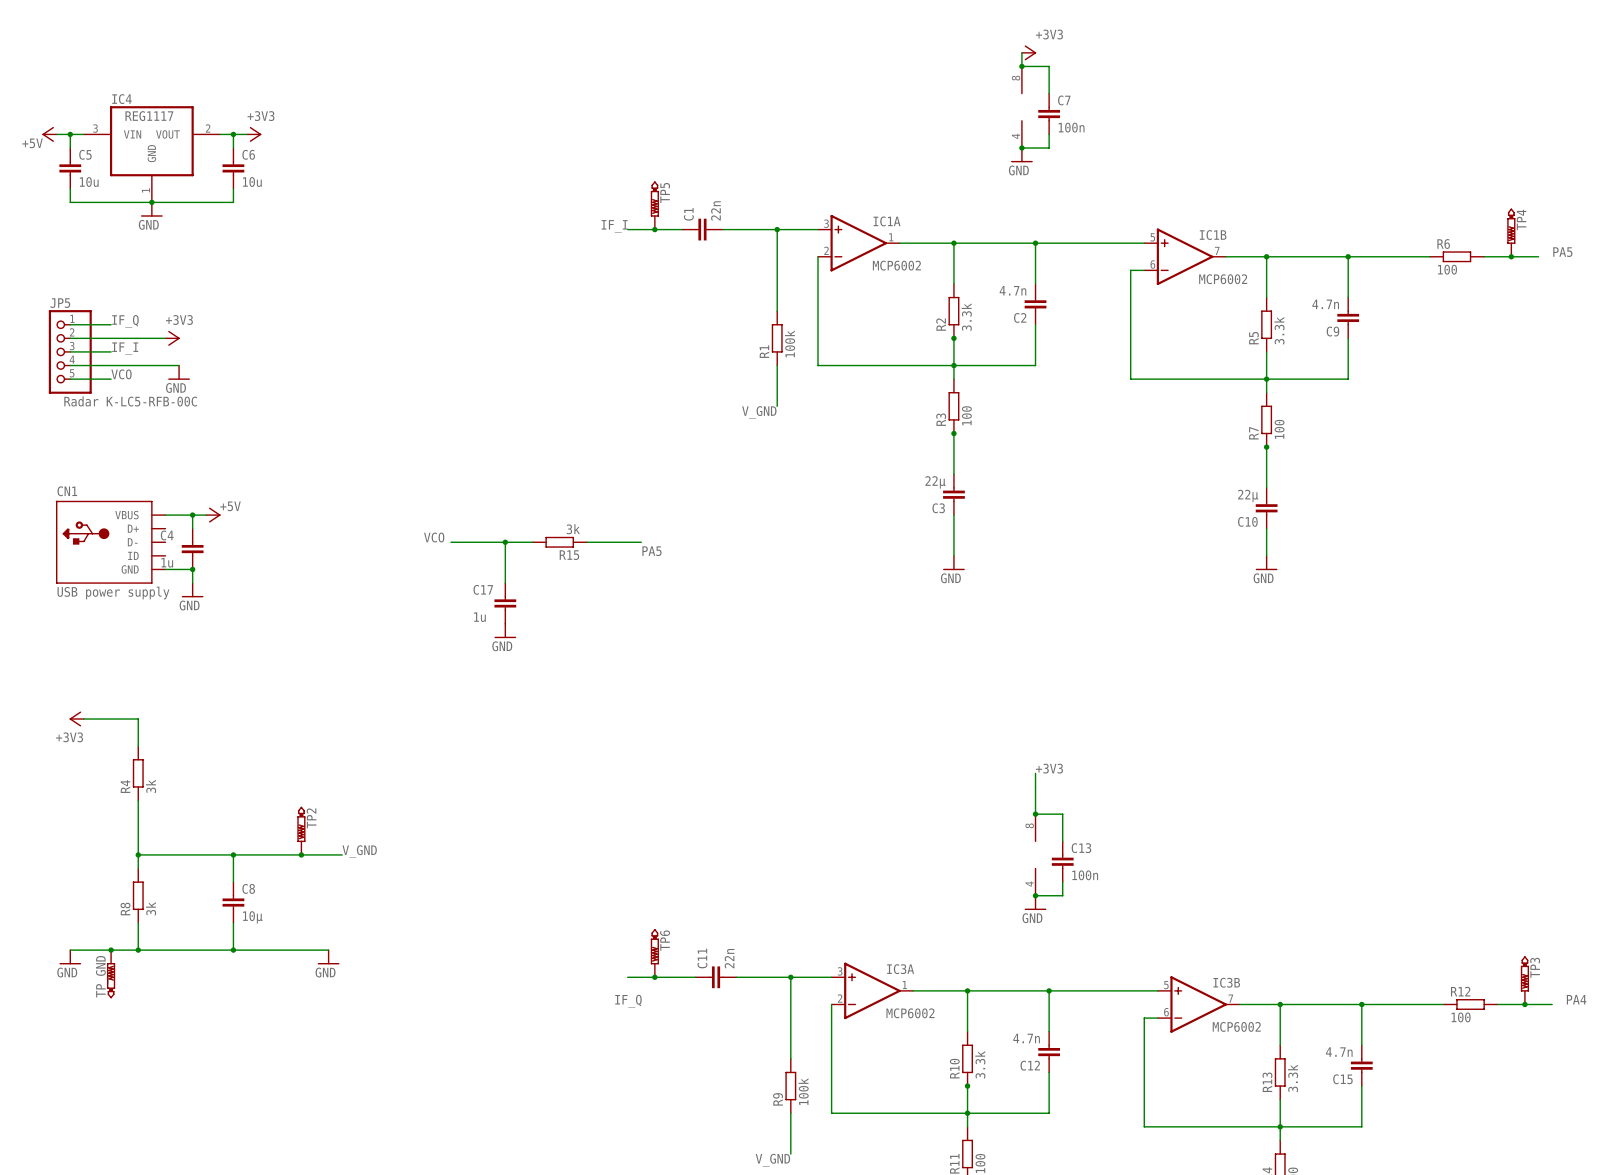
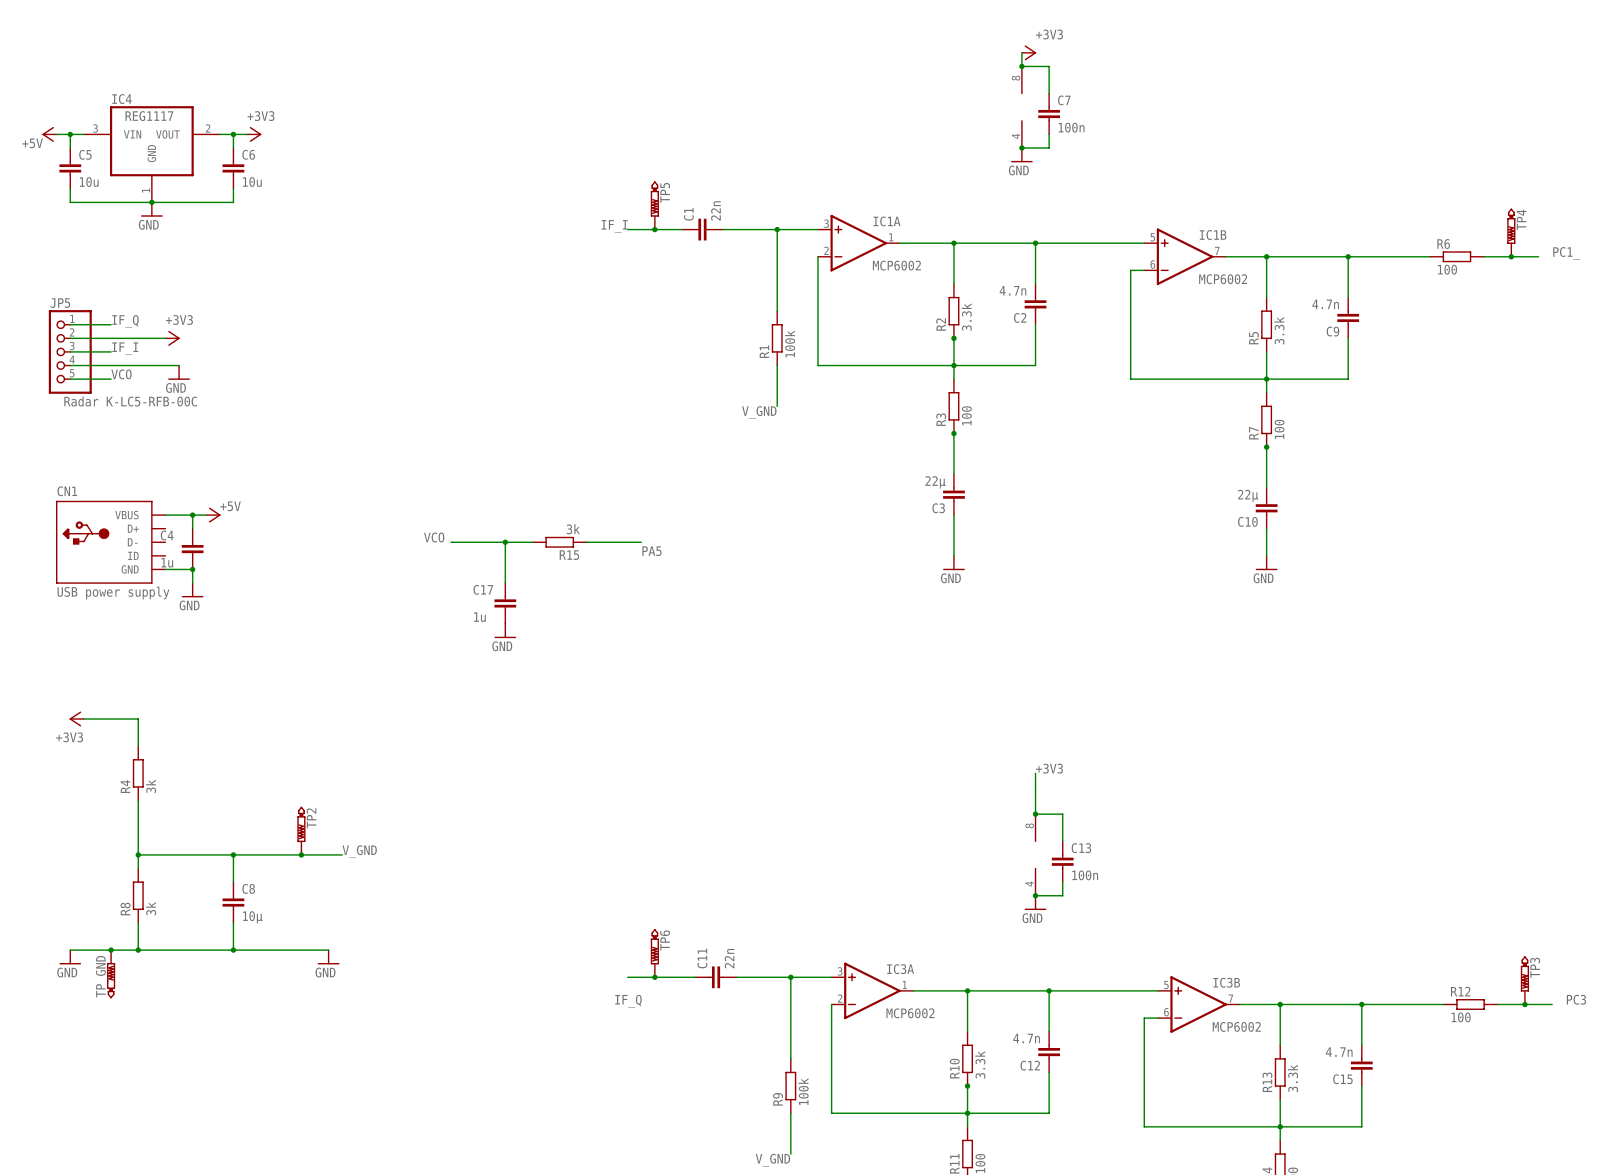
label: PA5 (1562, 252) -> PC1_ (1566, 253)
label: PA4 (1576, 999) -> PC3 (1576, 999)

